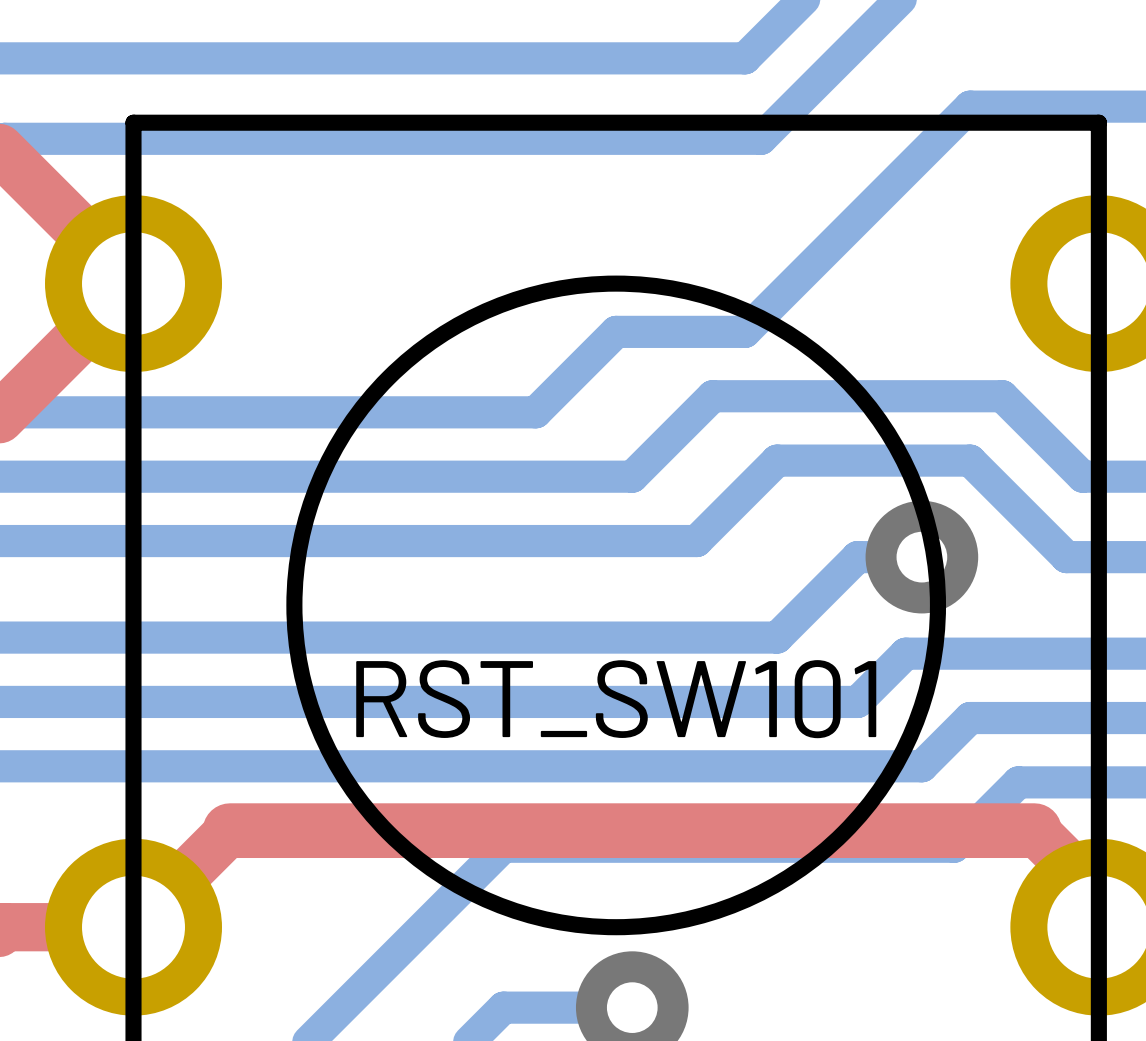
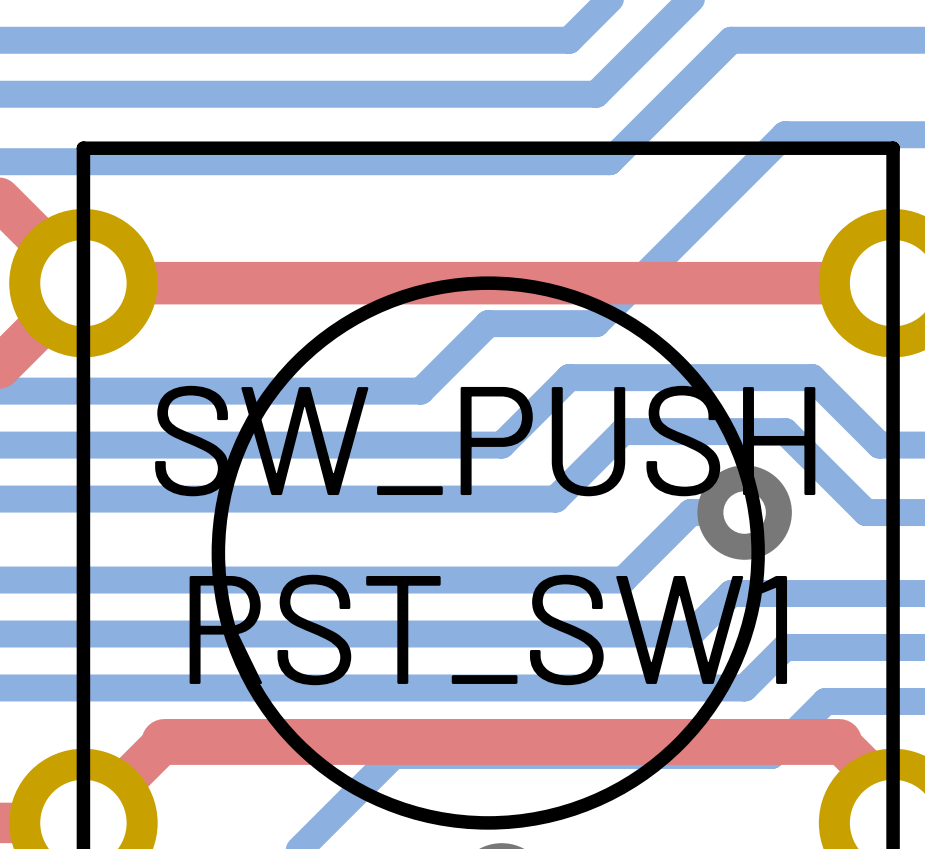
top track: none -> (83, 283) (893, 283)
RST_SW101 value: none -> SW_PUSH (485, 441)
RST_SW101 name: RST_SW101 (616, 699) -> RST_SW1 (488, 629)

